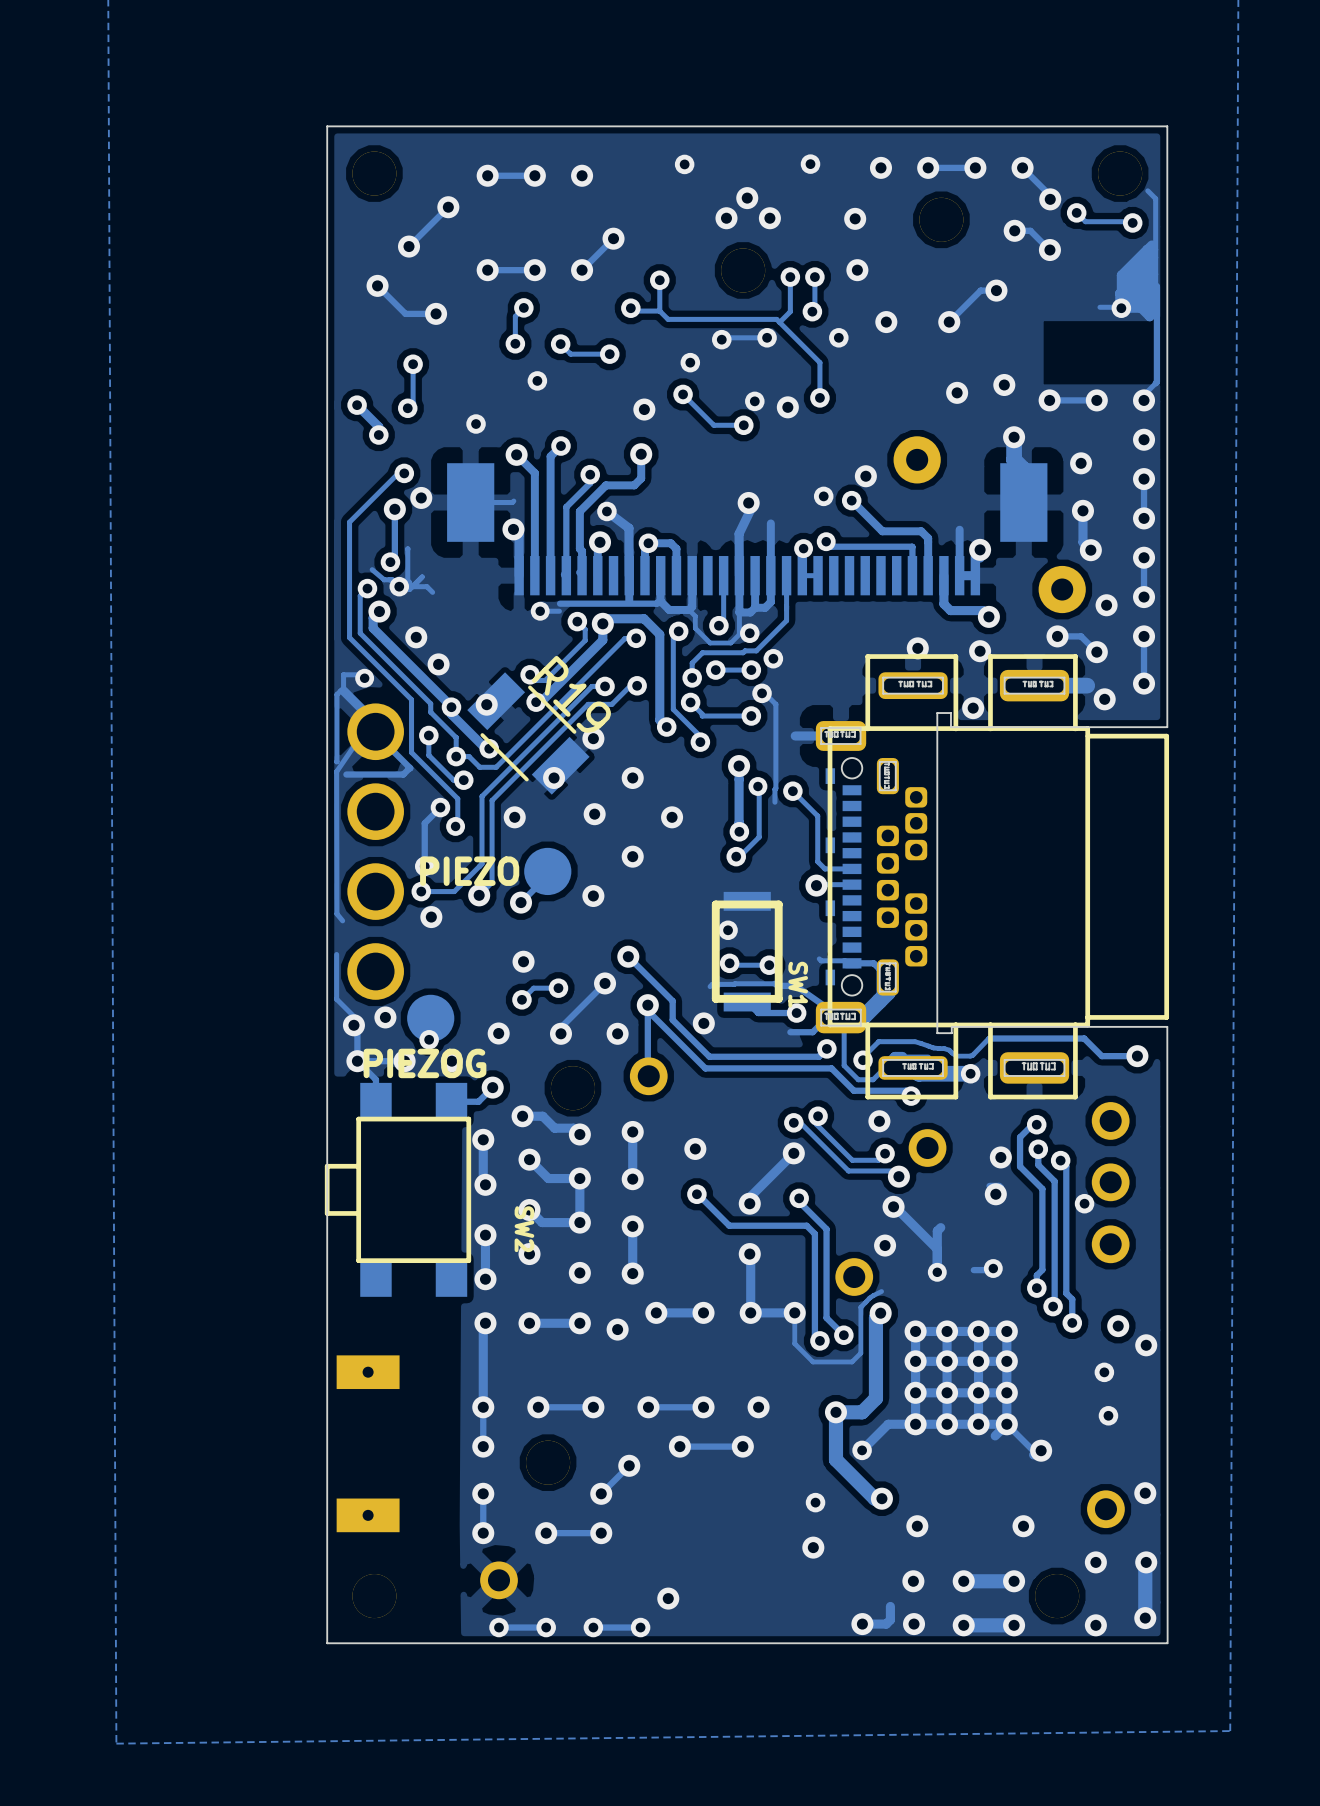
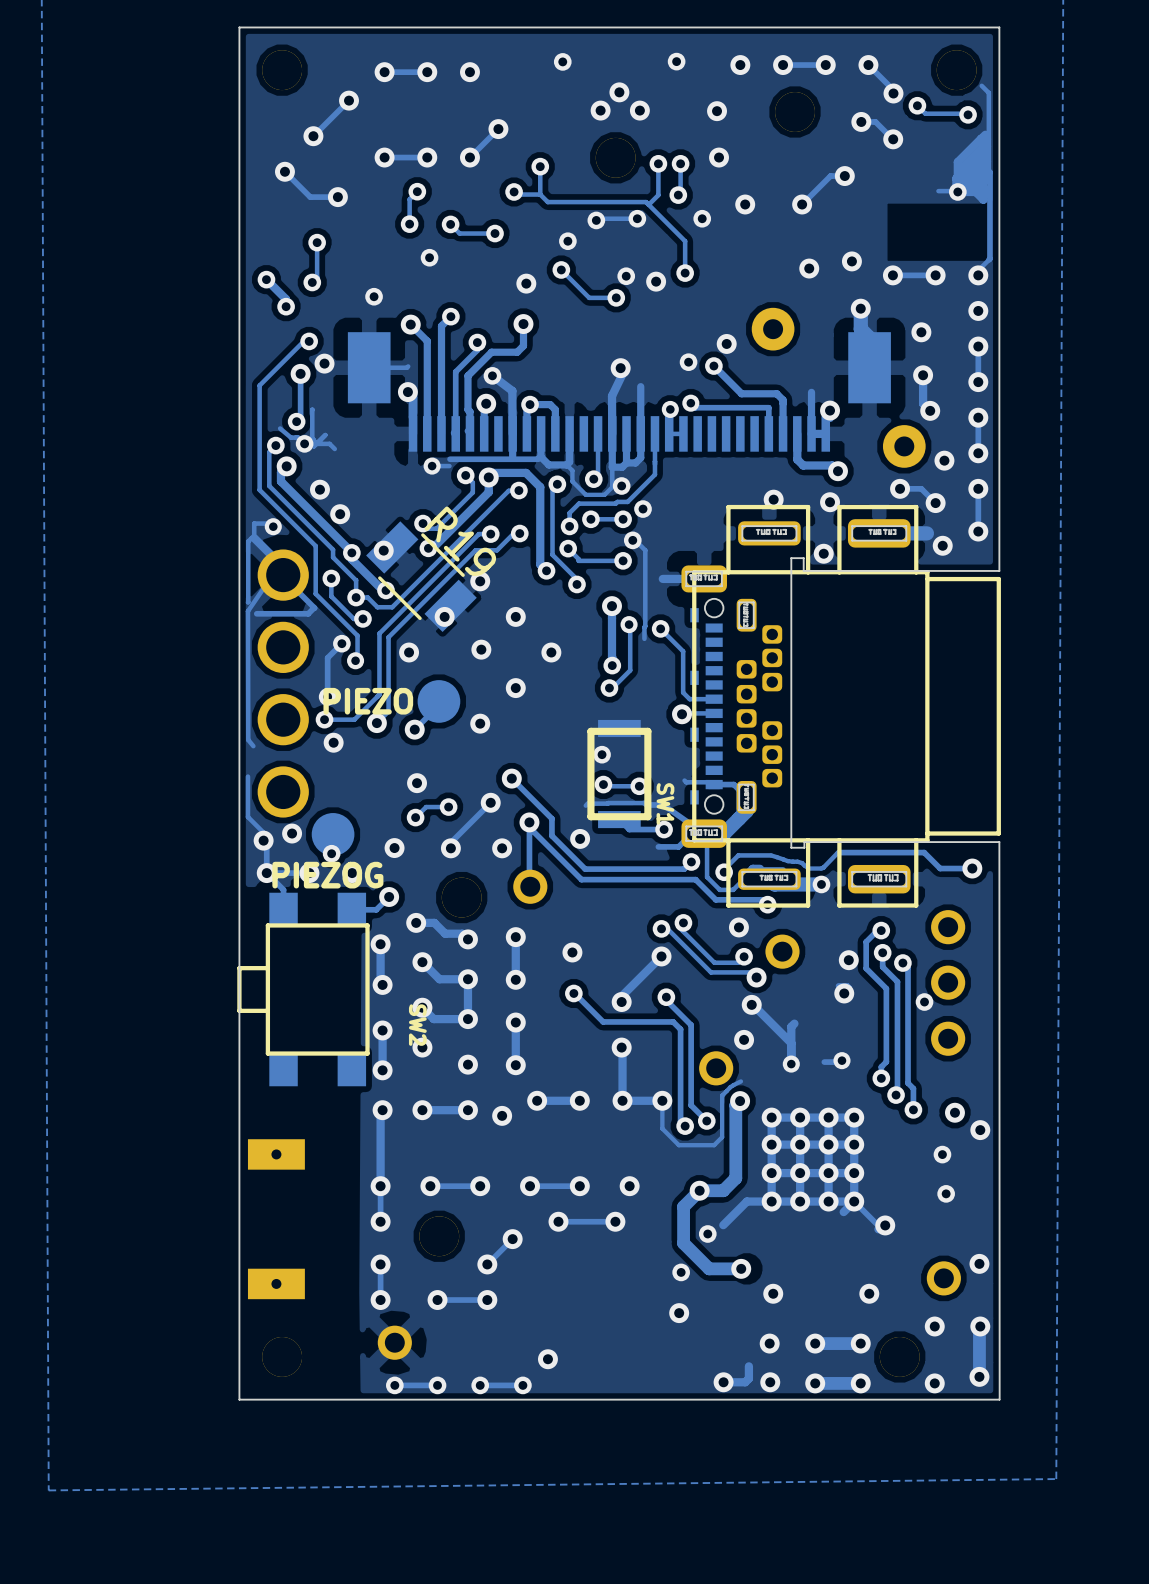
track: (835, 1412) (835, 1459) (874, 1498) -> (699, 1190) (683, 1206) (683, 1243) (709, 1268) (734, 1268)
via position: (862, 1450) -> (707, 1233)

